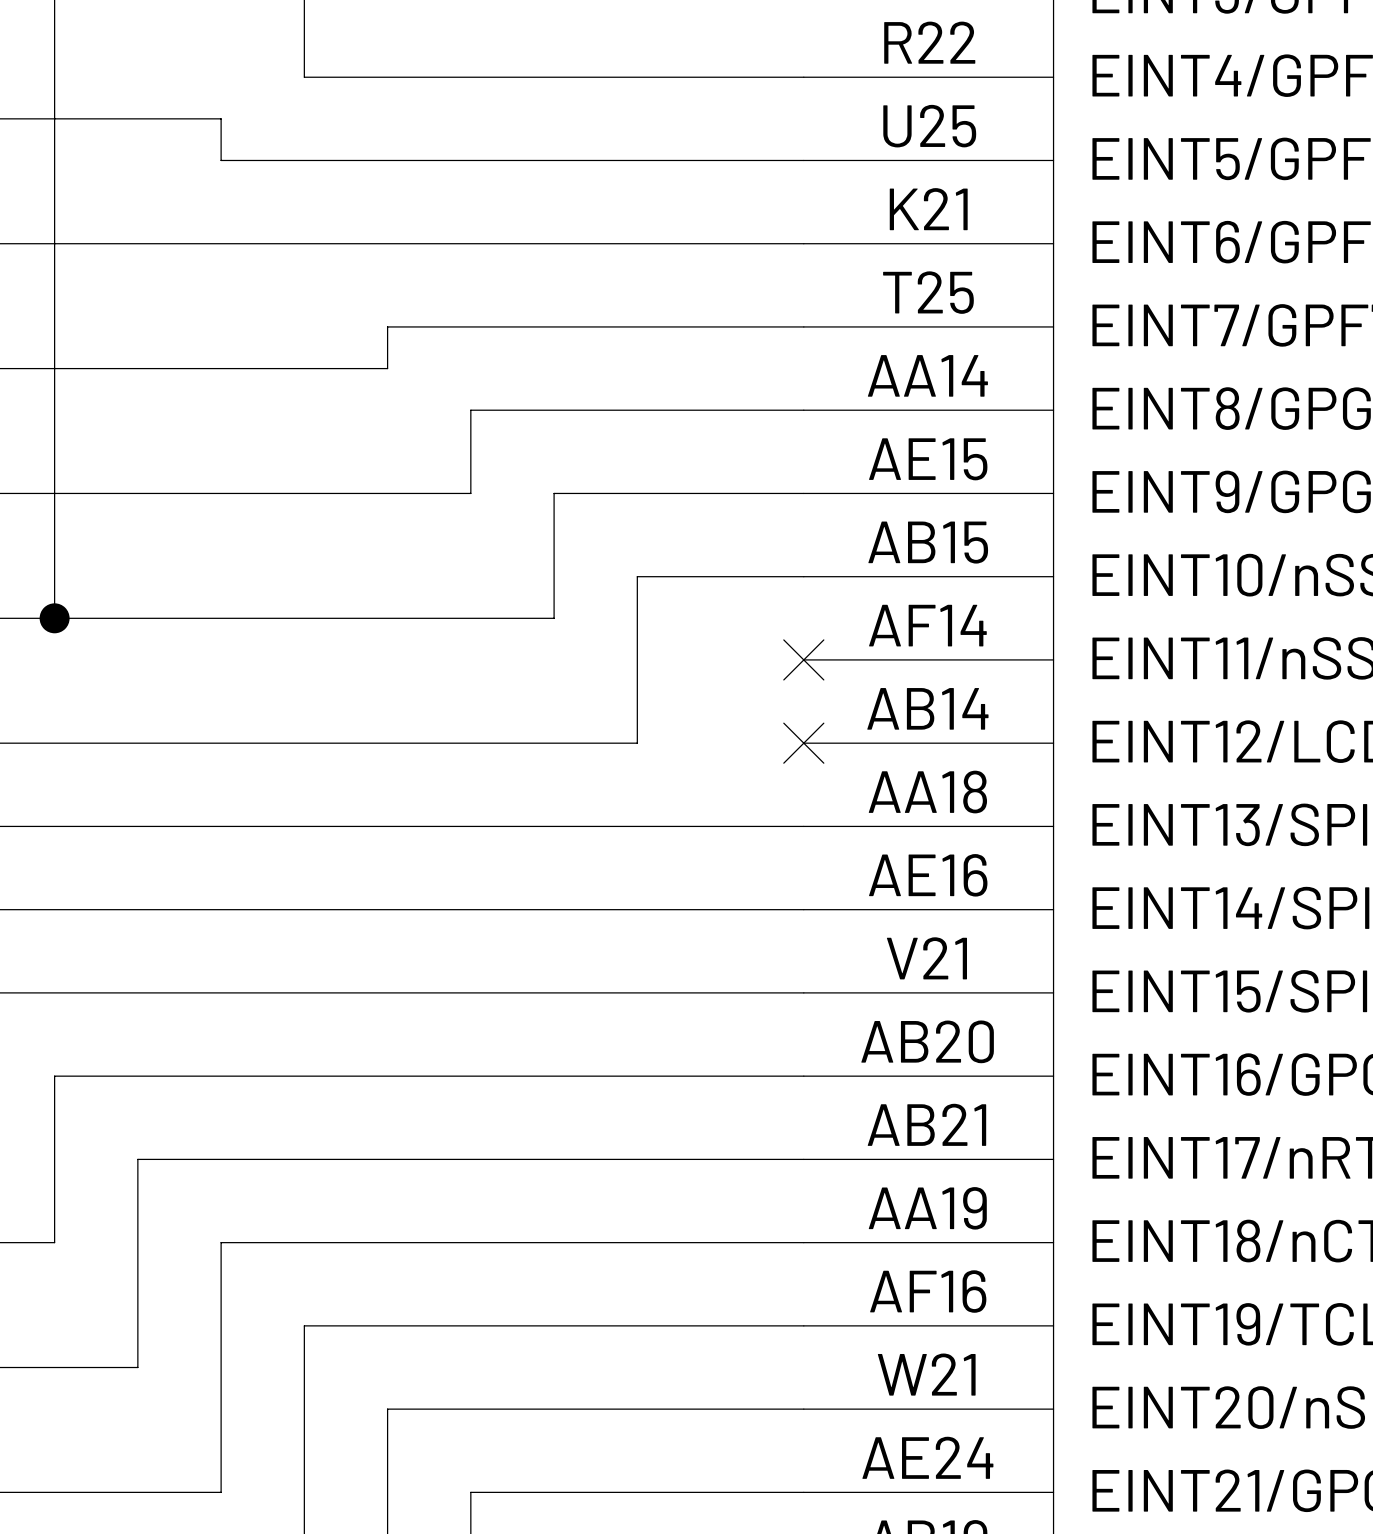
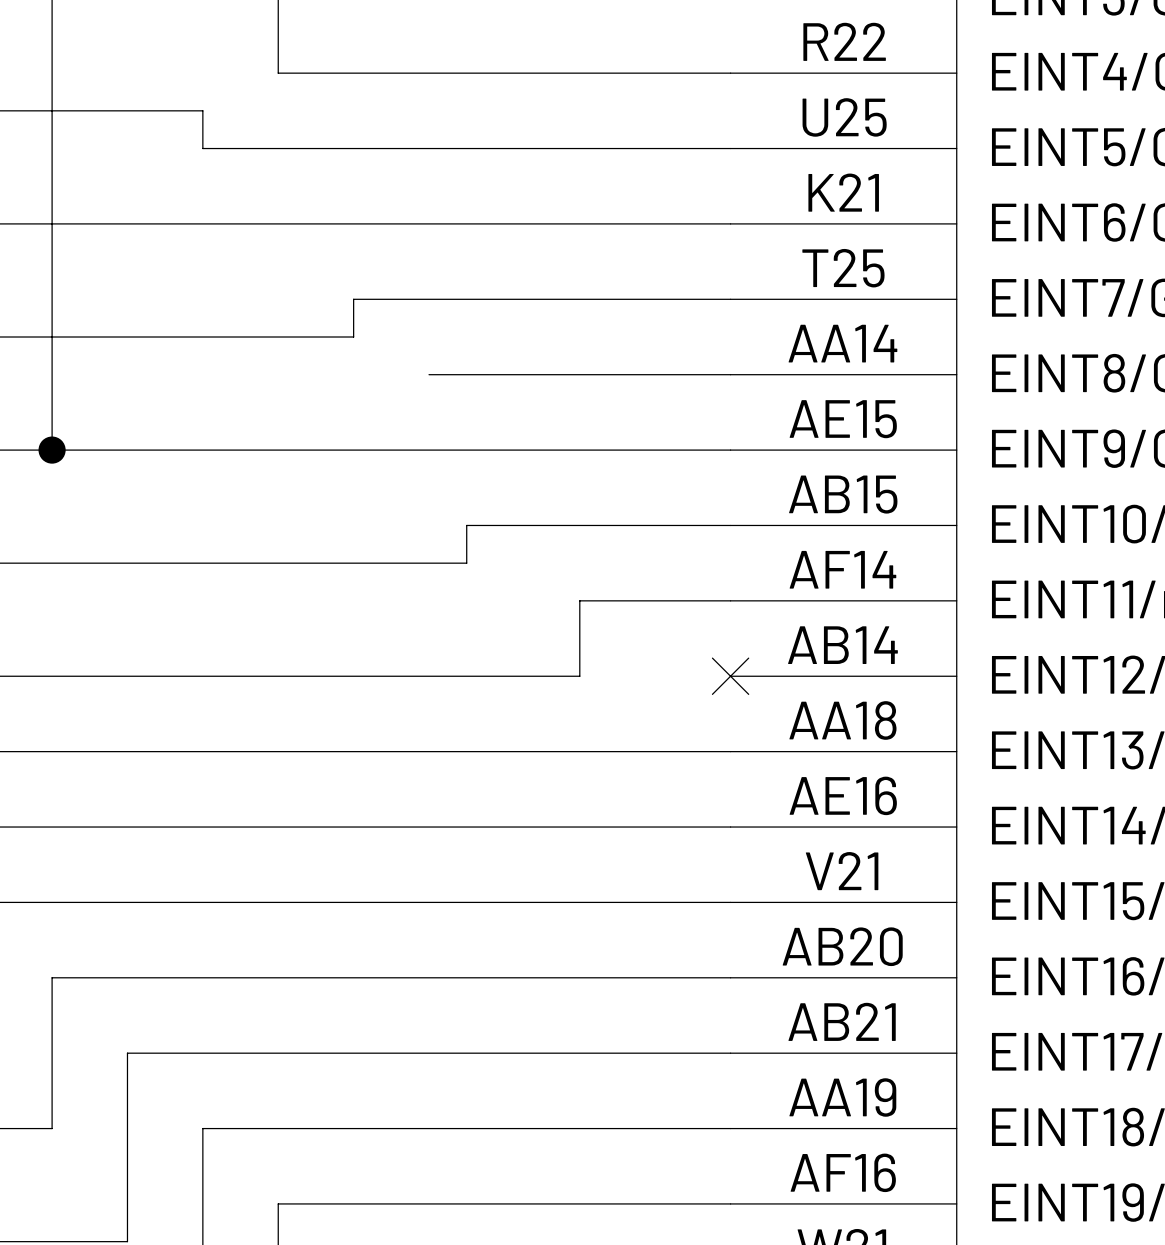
wire: (470, 410) (470, 493) -> (504, 450) (429, 450)
wire: (54, 493) (54, 618) -> none
wire: (554, 493) (554, 618) (512, 618) -> (579, 525) (466, 525) (466, 563)
wire: (637, 576) (637, 659) -> (730, 600) (579, 600)
junction position: (54, 618) -> (52, 450)
no-connect mark: (803, 659) -> none

